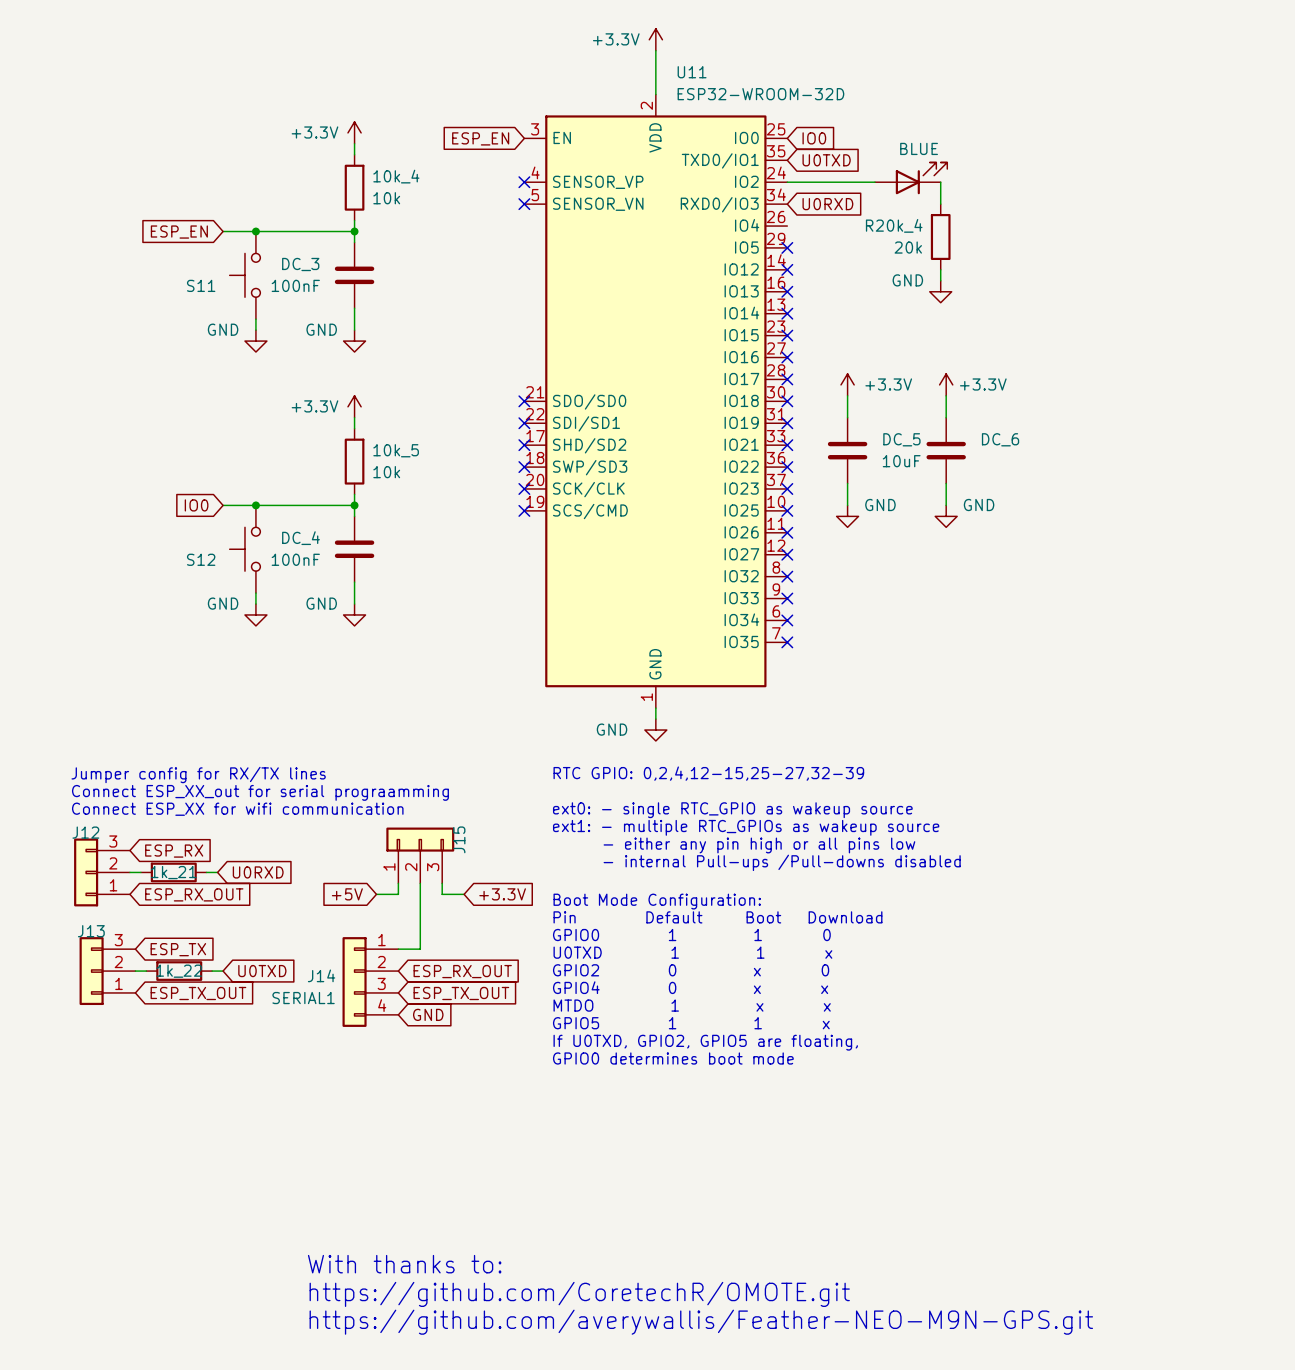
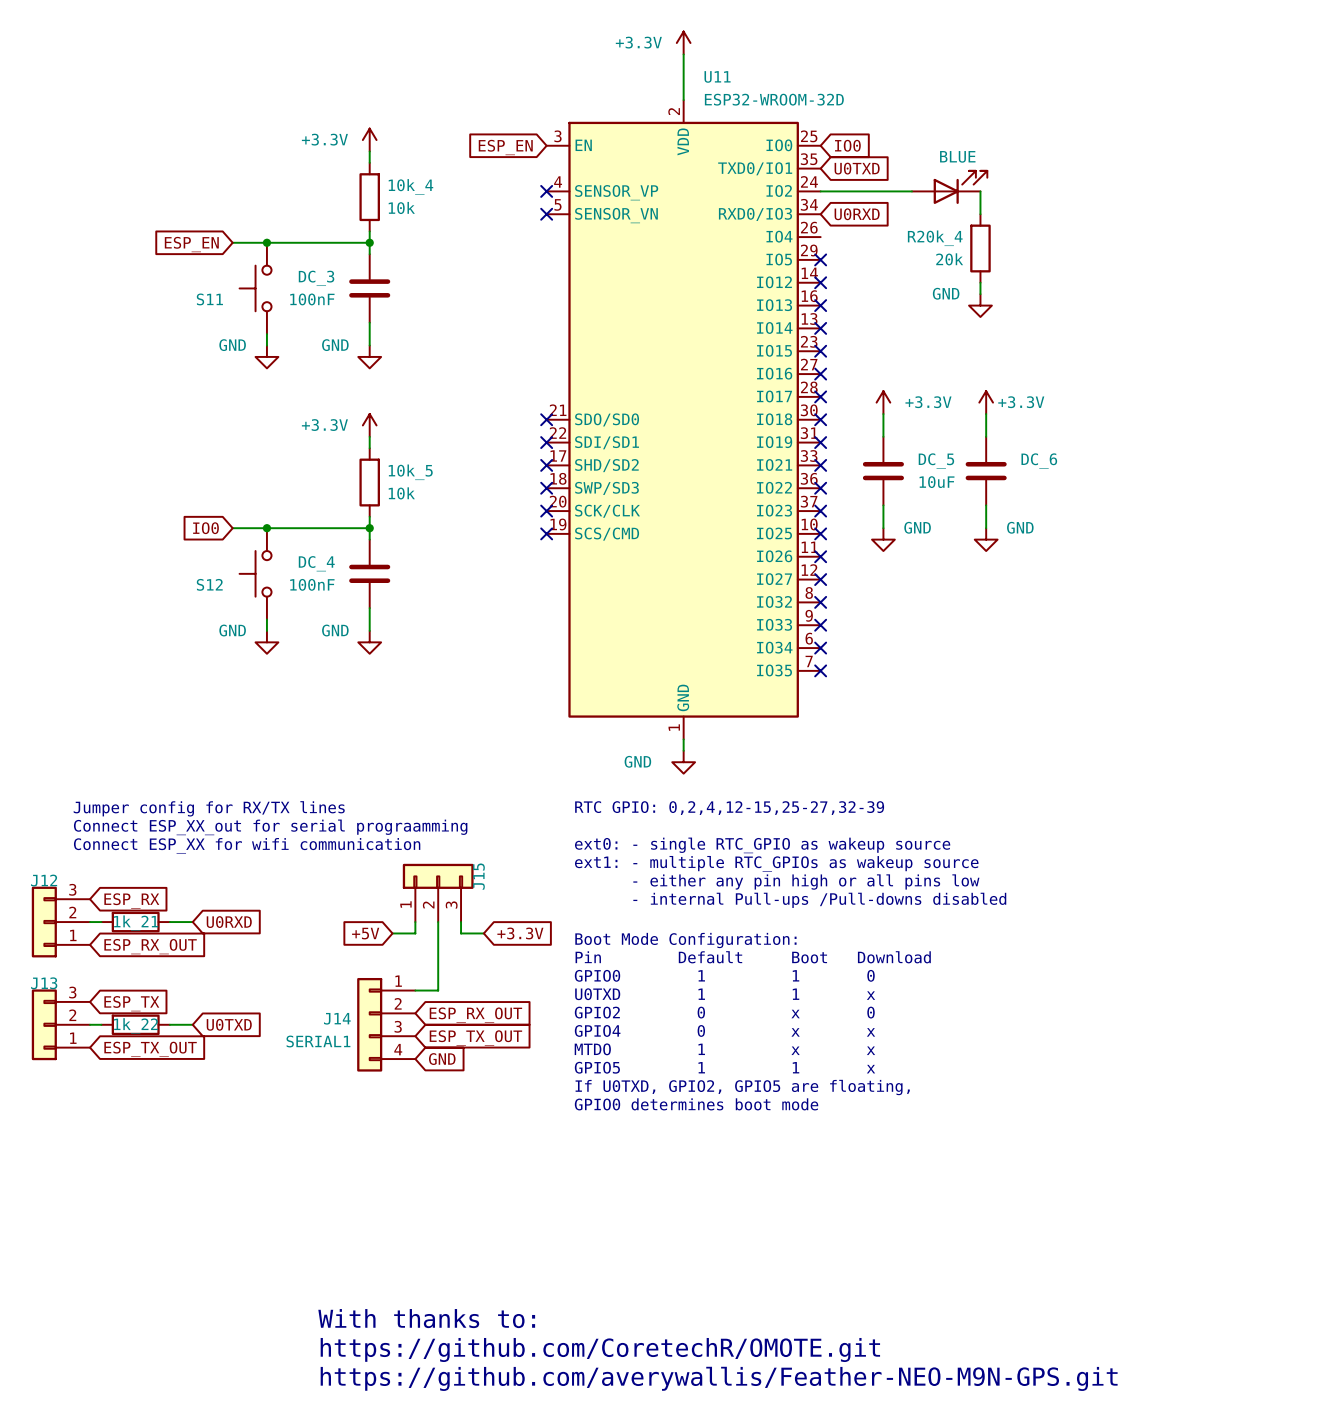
global label position: ESP_RX (174, 851) -> ESP_RX (131, 900)
J12 position: (102, 872) -> (60, 922)
1k_21 position: (173, 872) -> (135, 922)
global label position: U0RXD (258, 872) -> U0RXD (229, 922)
global label position: ESP_RX_OUT (194, 894) -> ESP_RX_OUT (150, 946)
global label position: ESP_TX (178, 949) -> ESP_TX (131, 1003)
J13 position: (107, 971) -> (60, 1024)
1k_22 position: (179, 971) -> (135, 1024)
global label position: U0TXD (262, 971) -> U0TXD (229, 1024)
global label position: ESP_TX_OUT (198, 993) -> ESP_TX_OUT (150, 1049)

